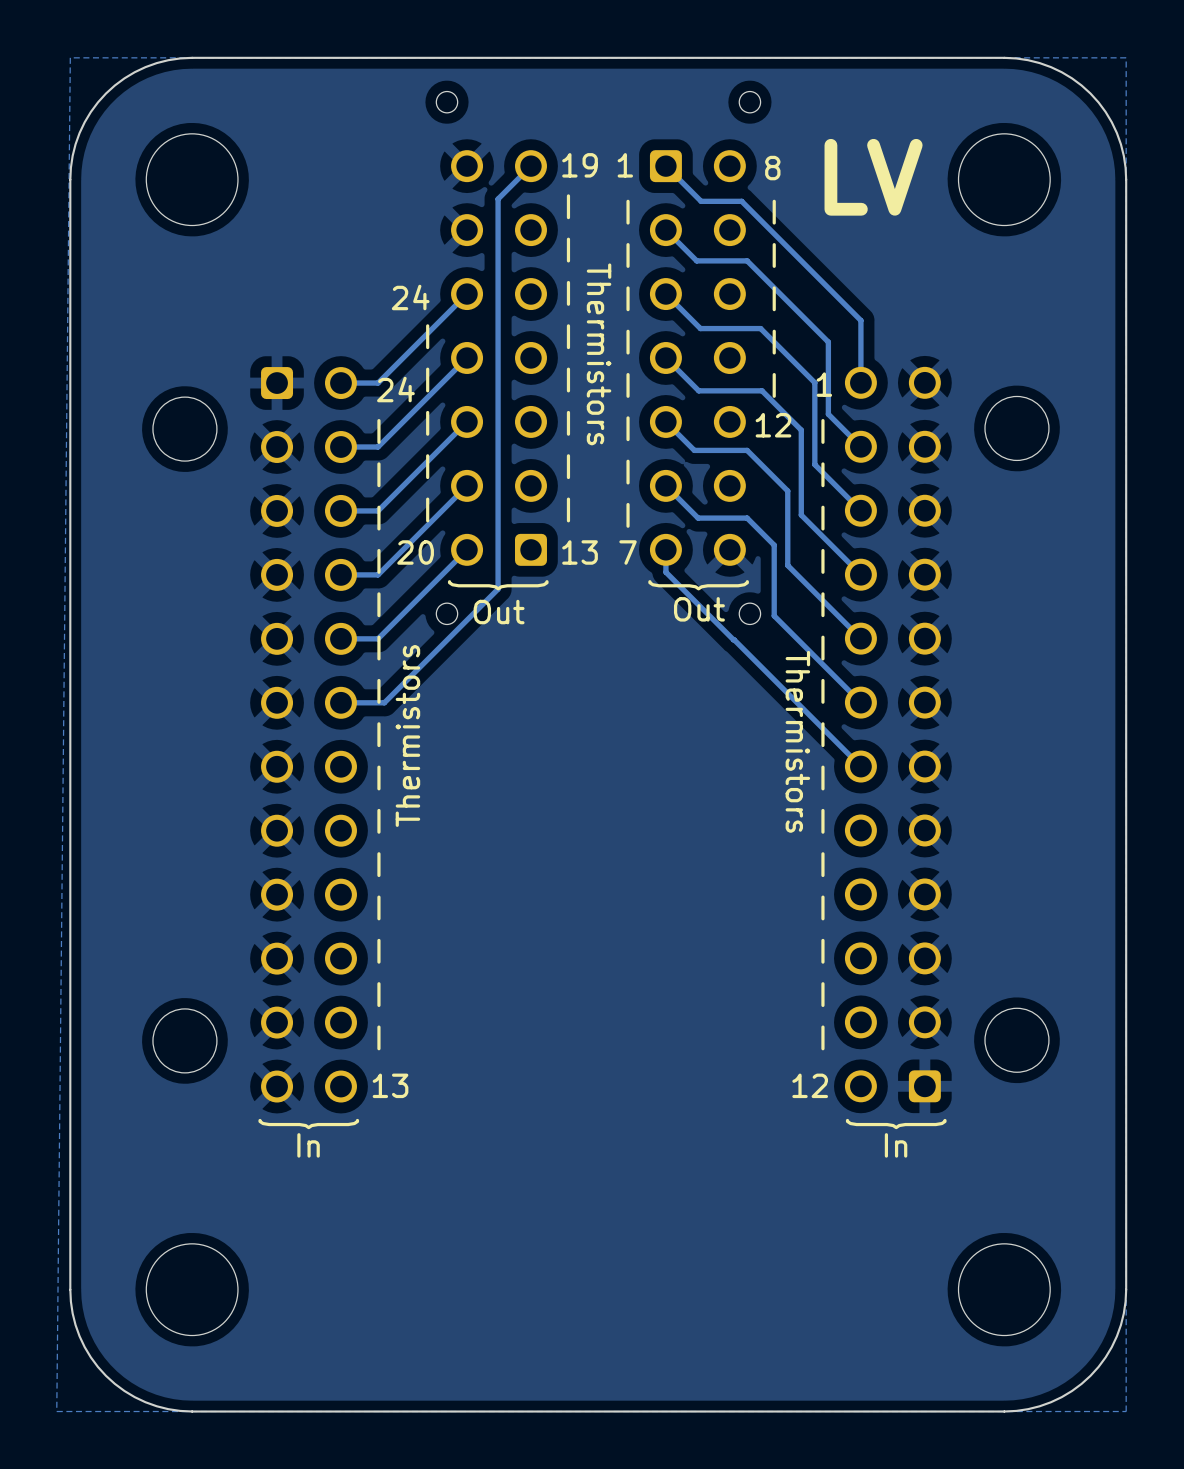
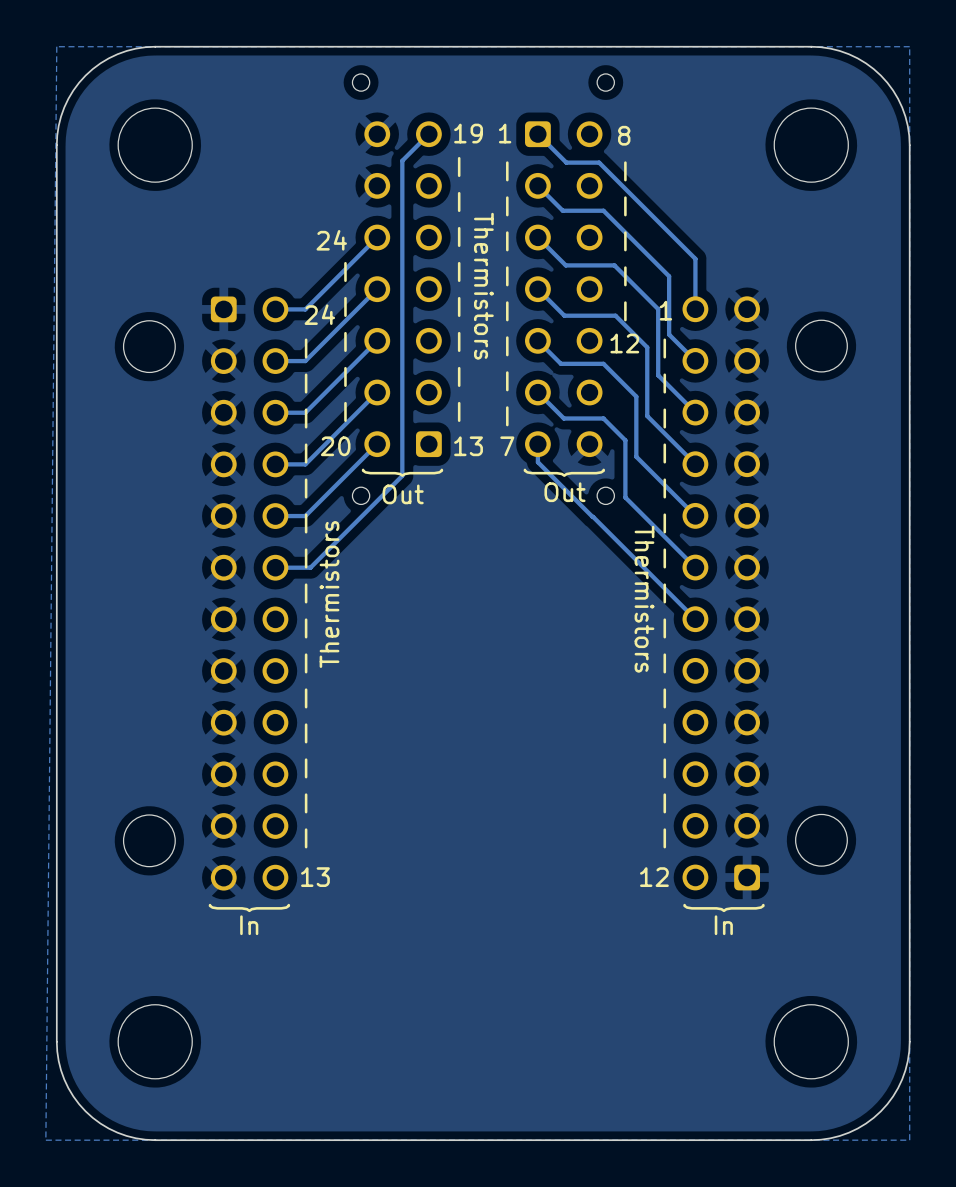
text: LV (873, 177) -> none

